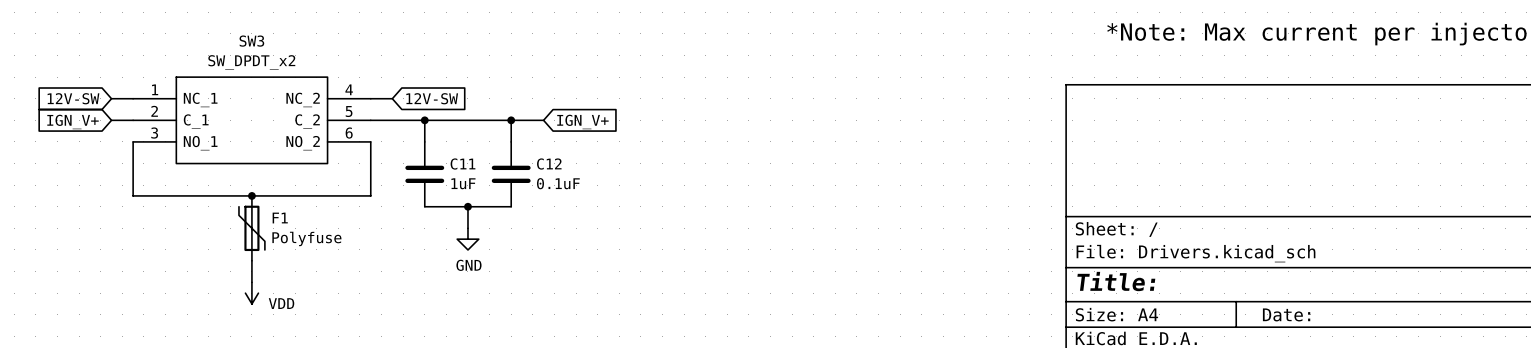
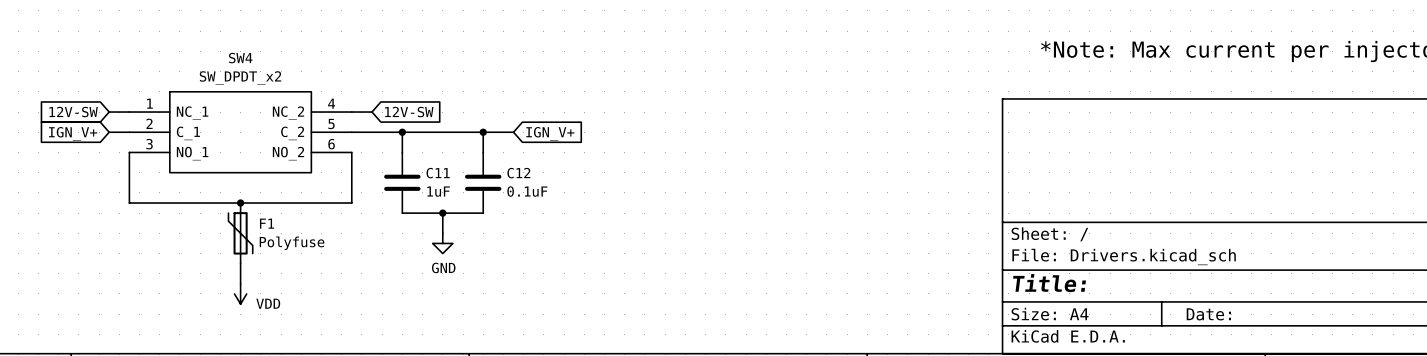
SW3 name: SW3 (251, 41) -> SW4 (240, 58)

